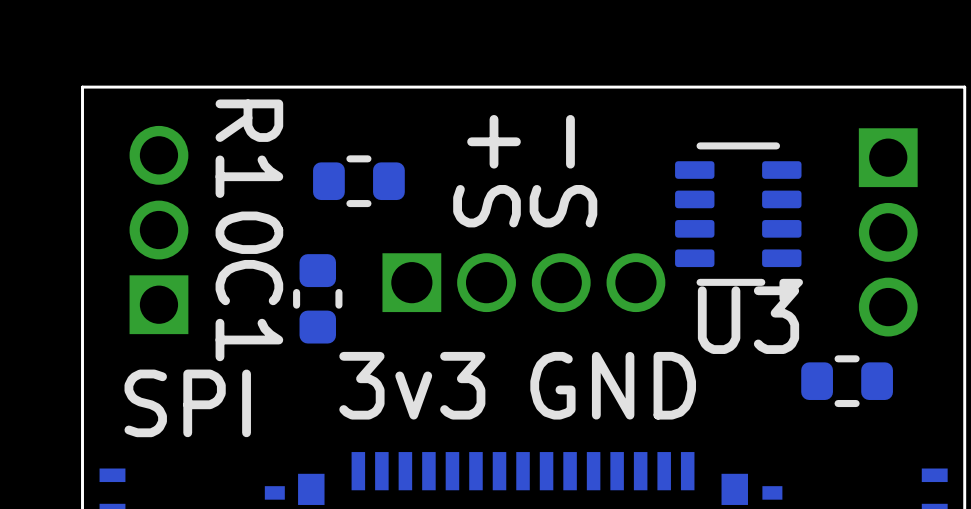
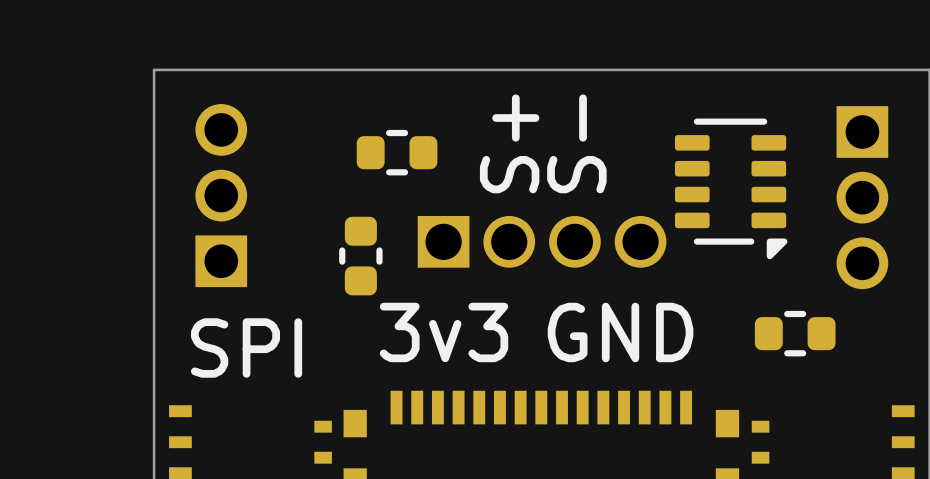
R10 name: R10 (249, 176) -> none
C1 name: C1 (249, 310) -> none
U3 name: U3 (748, 320) -> none
part position: (847, 381) -> (795, 333)

